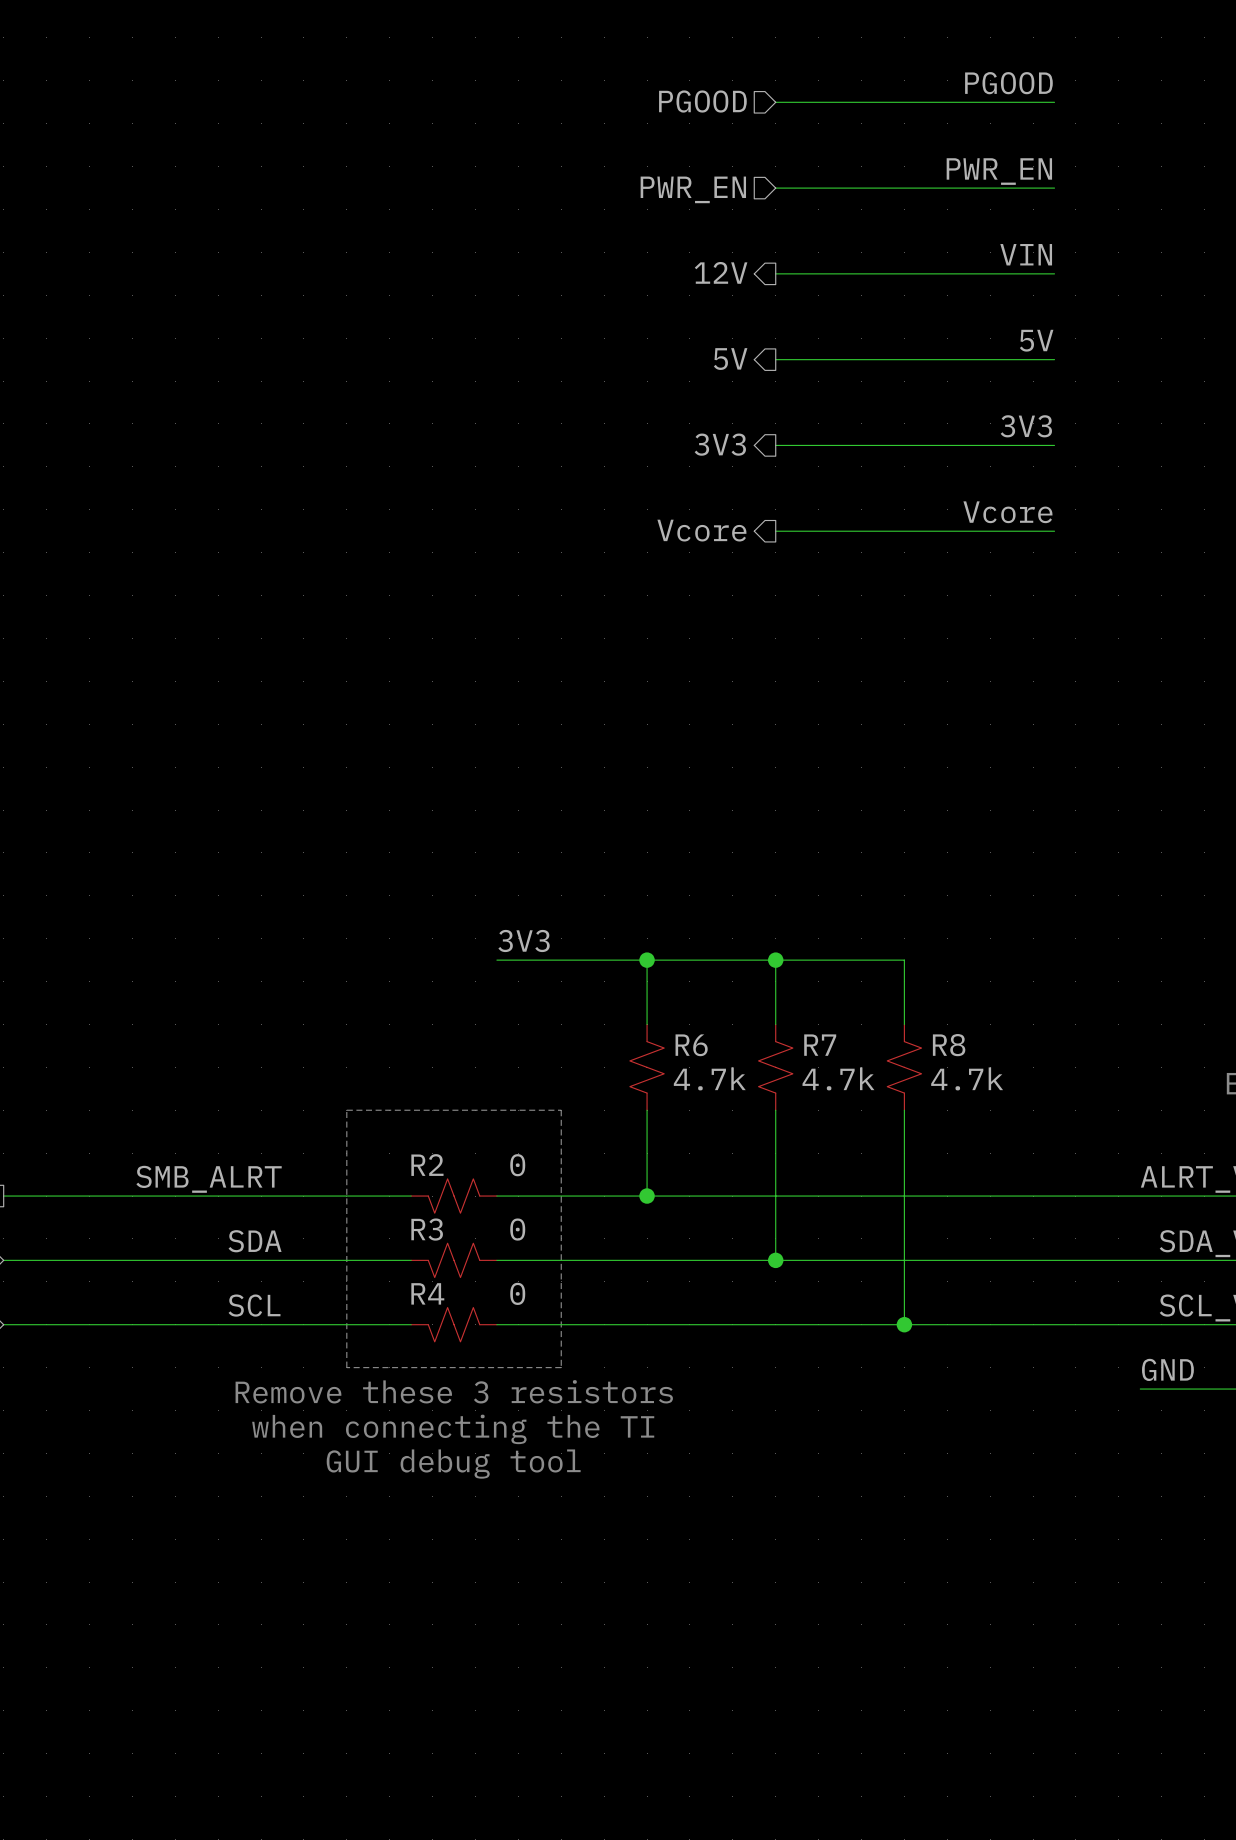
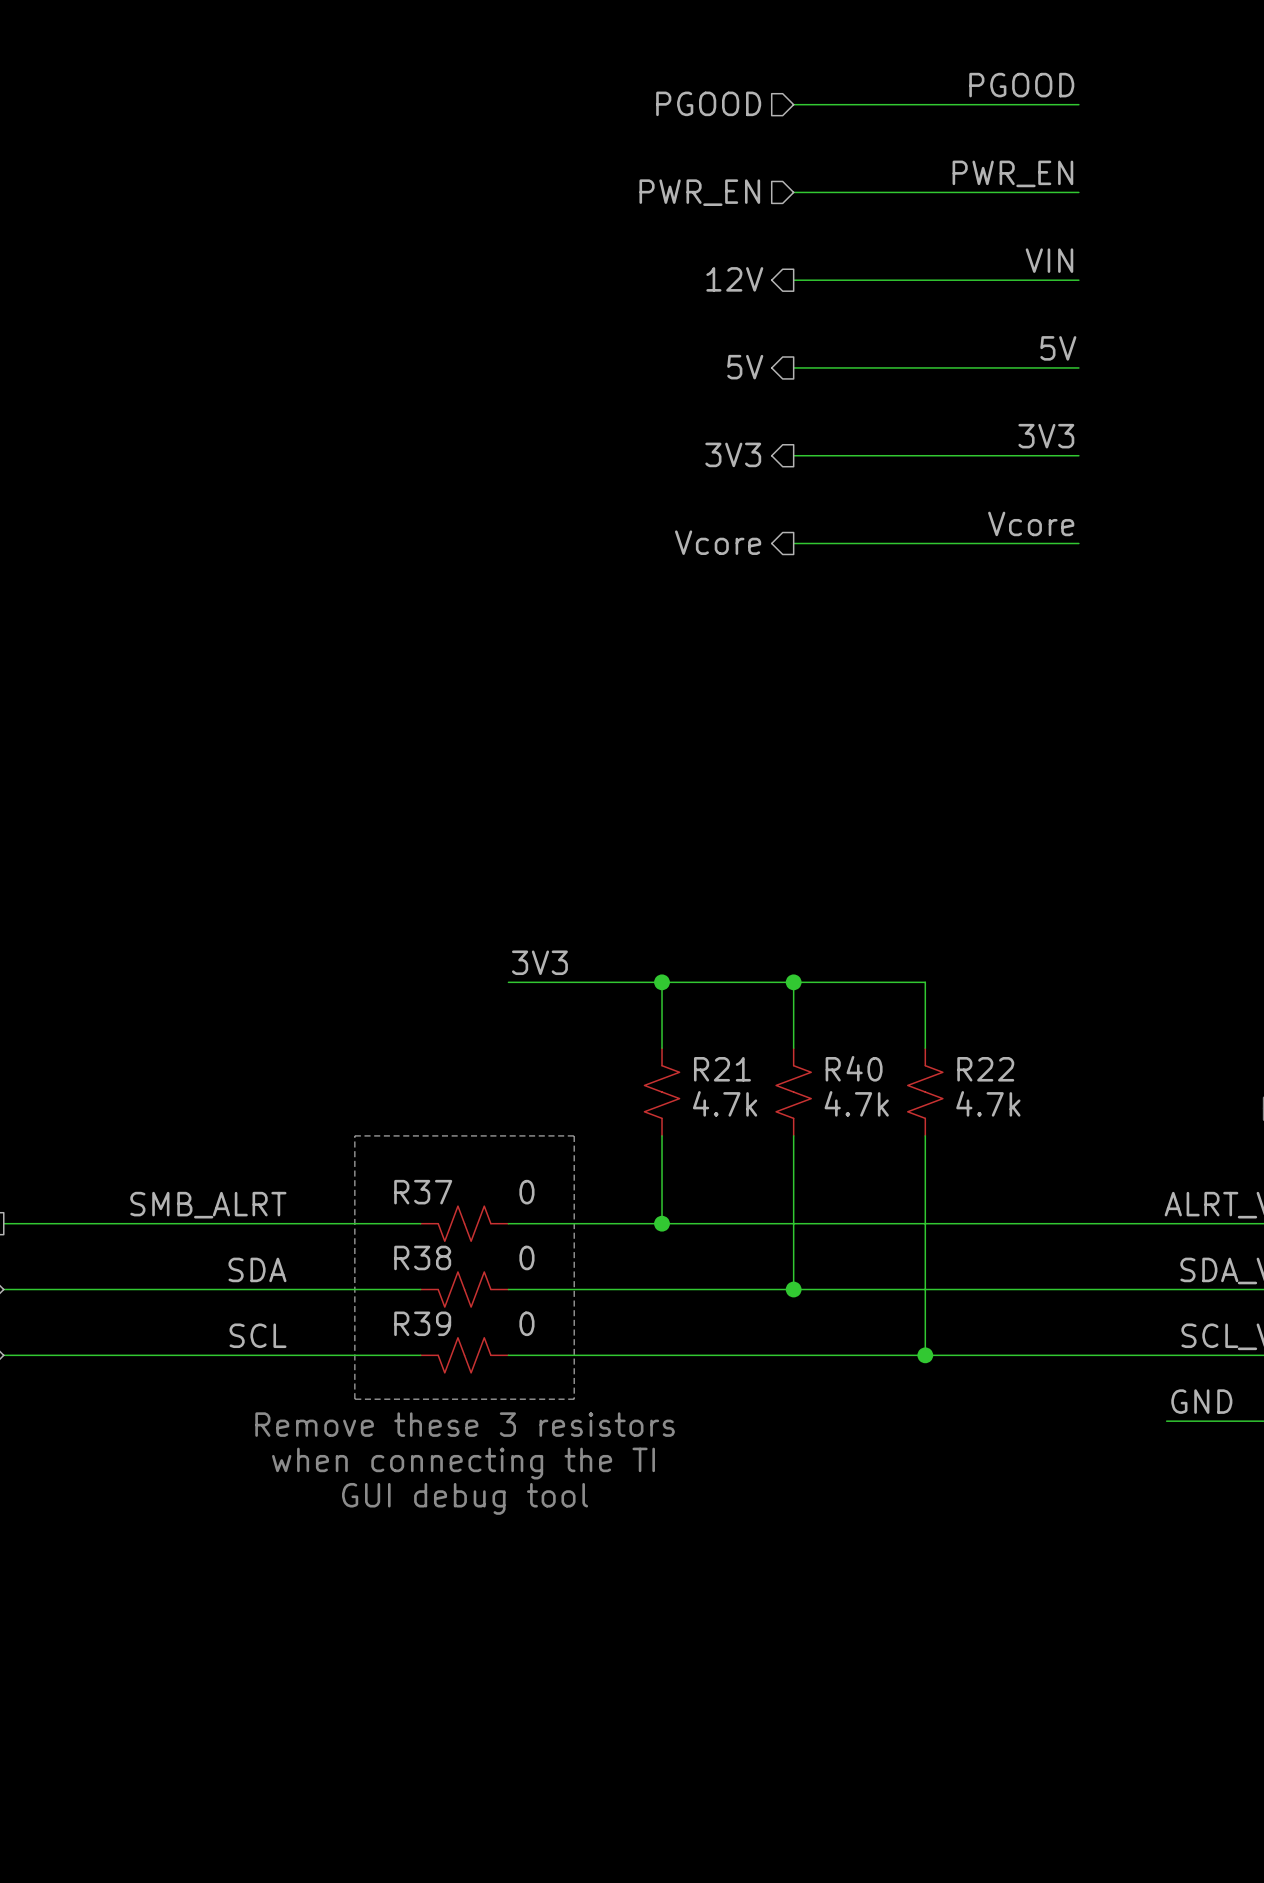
R6 name: R6 (691, 1045) -> R21 (722, 1069)
R7 name: R7 (820, 1045) -> R40 (854, 1068)
R8 name: R8 (949, 1045) -> R22 (985, 1069)
R2 name: R2 (427, 1165) -> R37 (423, 1192)
R3 name: R3 (427, 1229) -> R38 (422, 1257)
R4 name: R4 (427, 1293) -> R39 (422, 1323)

